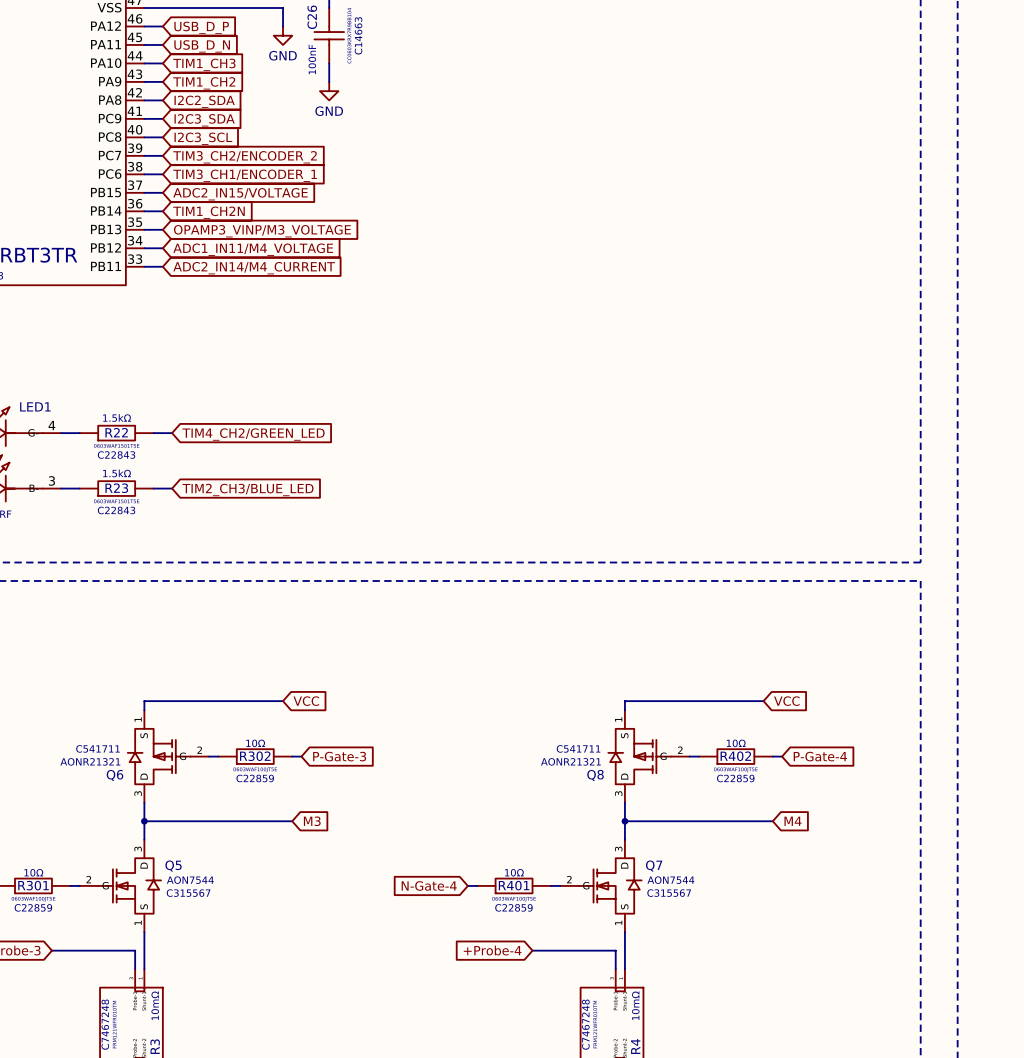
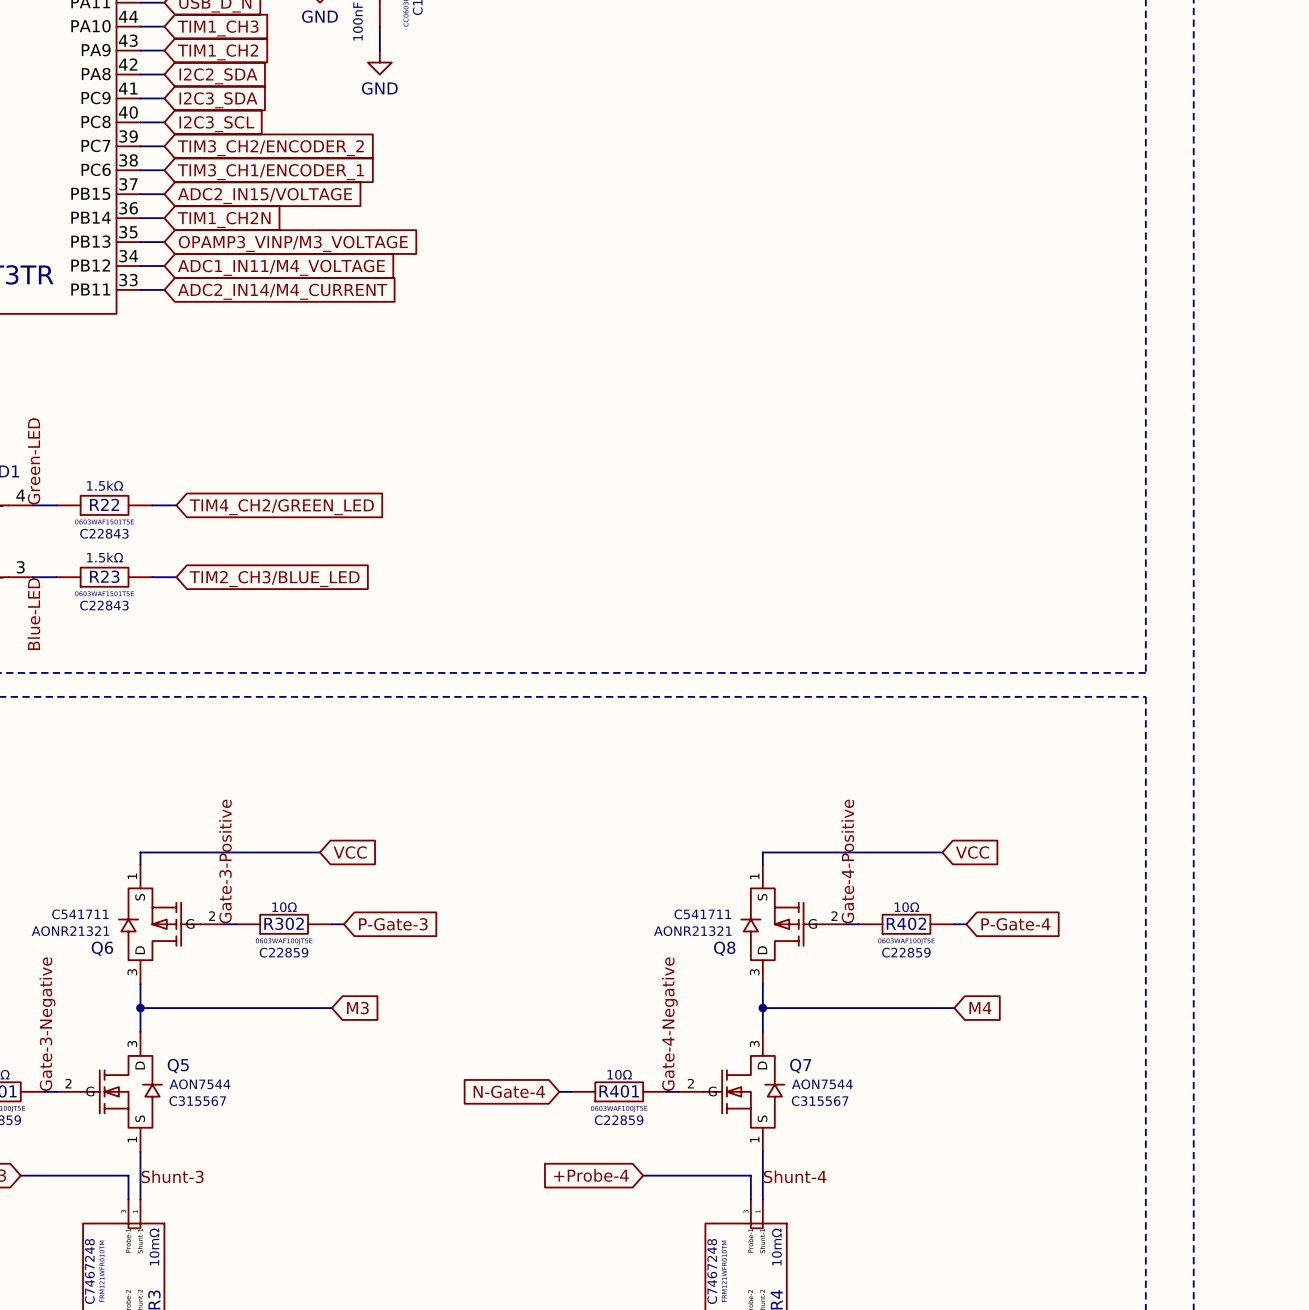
label: none -> Green-LED (34, 461)
label: none -> Blue-LED (33, 614)
label: none -> Gate-3-Positive (225, 861)
label: none -> Gate-4-Positive (847, 861)
label: none -> Gate-3-Negative (47, 1024)
label: none -> Gate-4-Negative (669, 1024)
label: none -> Shunt-3 (172, 1176)
label: none -> Shunt-4 (795, 1176)

